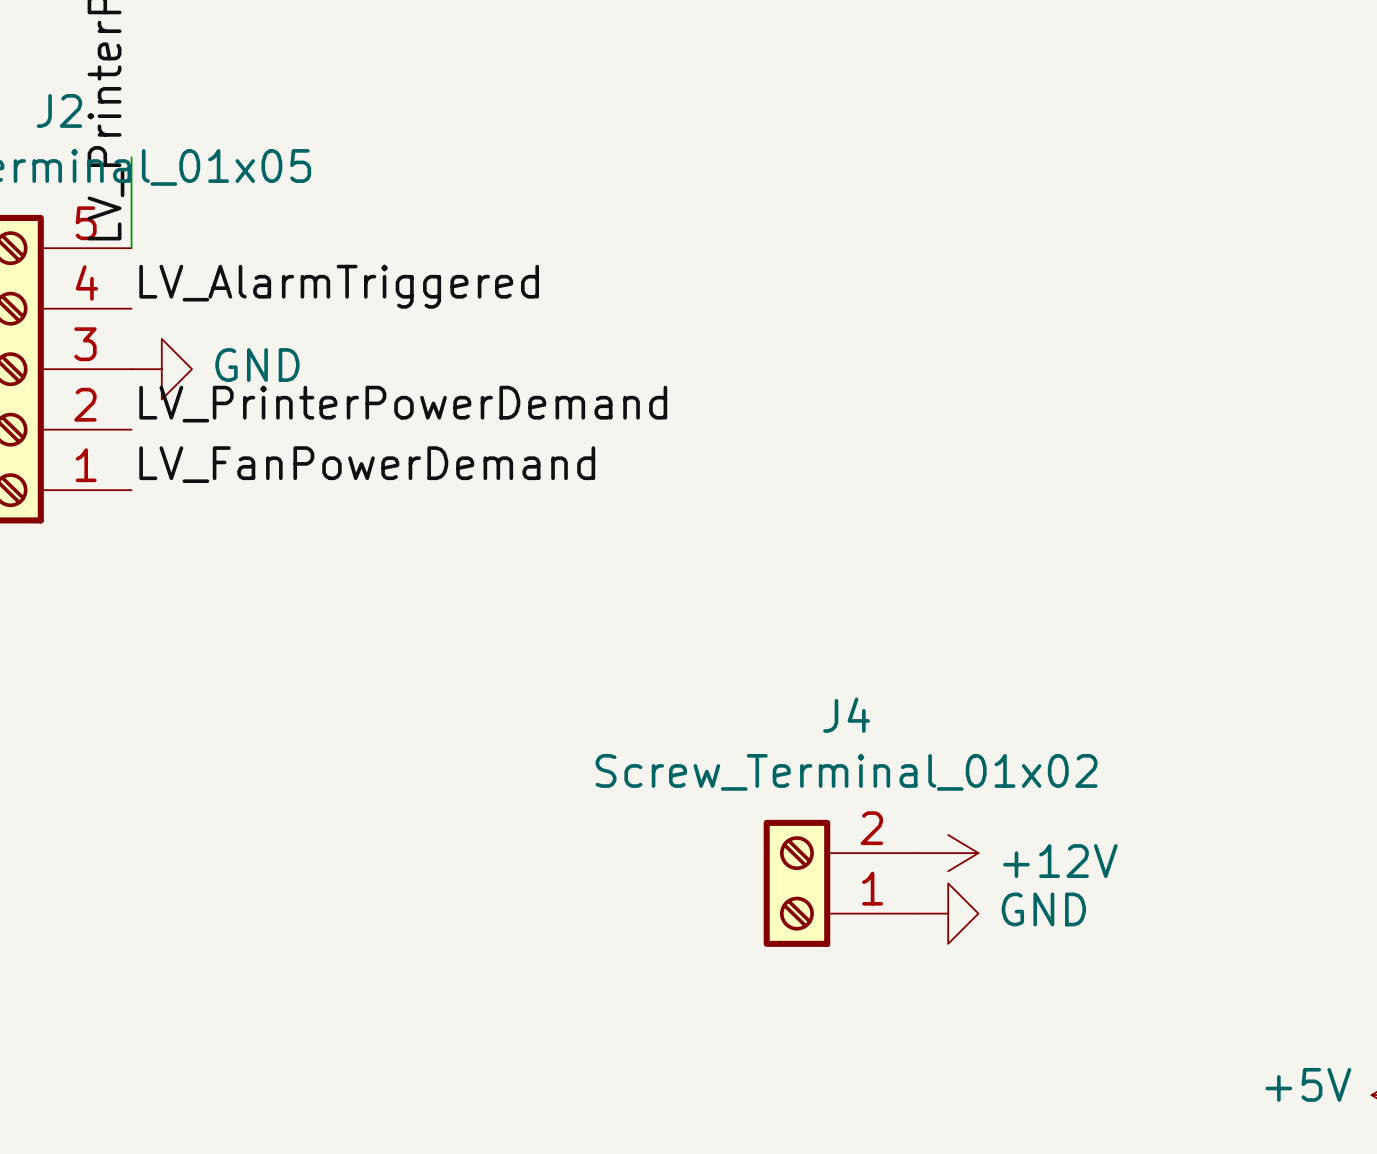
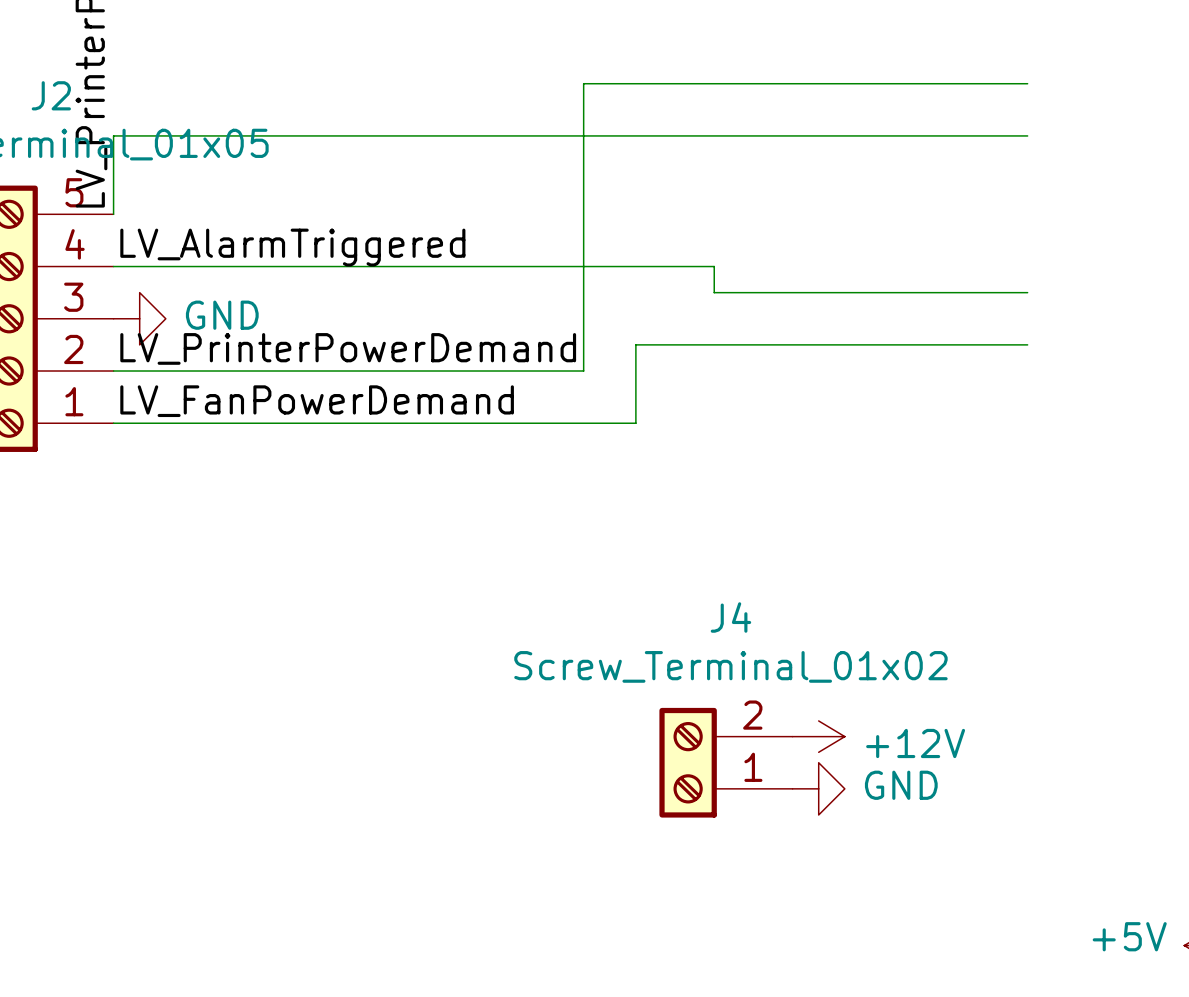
wire: none -> (1027, 83) (583, 83) (583, 371) (113, 371)
wire: none -> (113, 135) (1027, 135)
wire: none -> (113, 266) (714, 266) (714, 292) (1027, 292)
wire: none -> (1027, 344) (635, 344) (635, 423) (113, 423)

